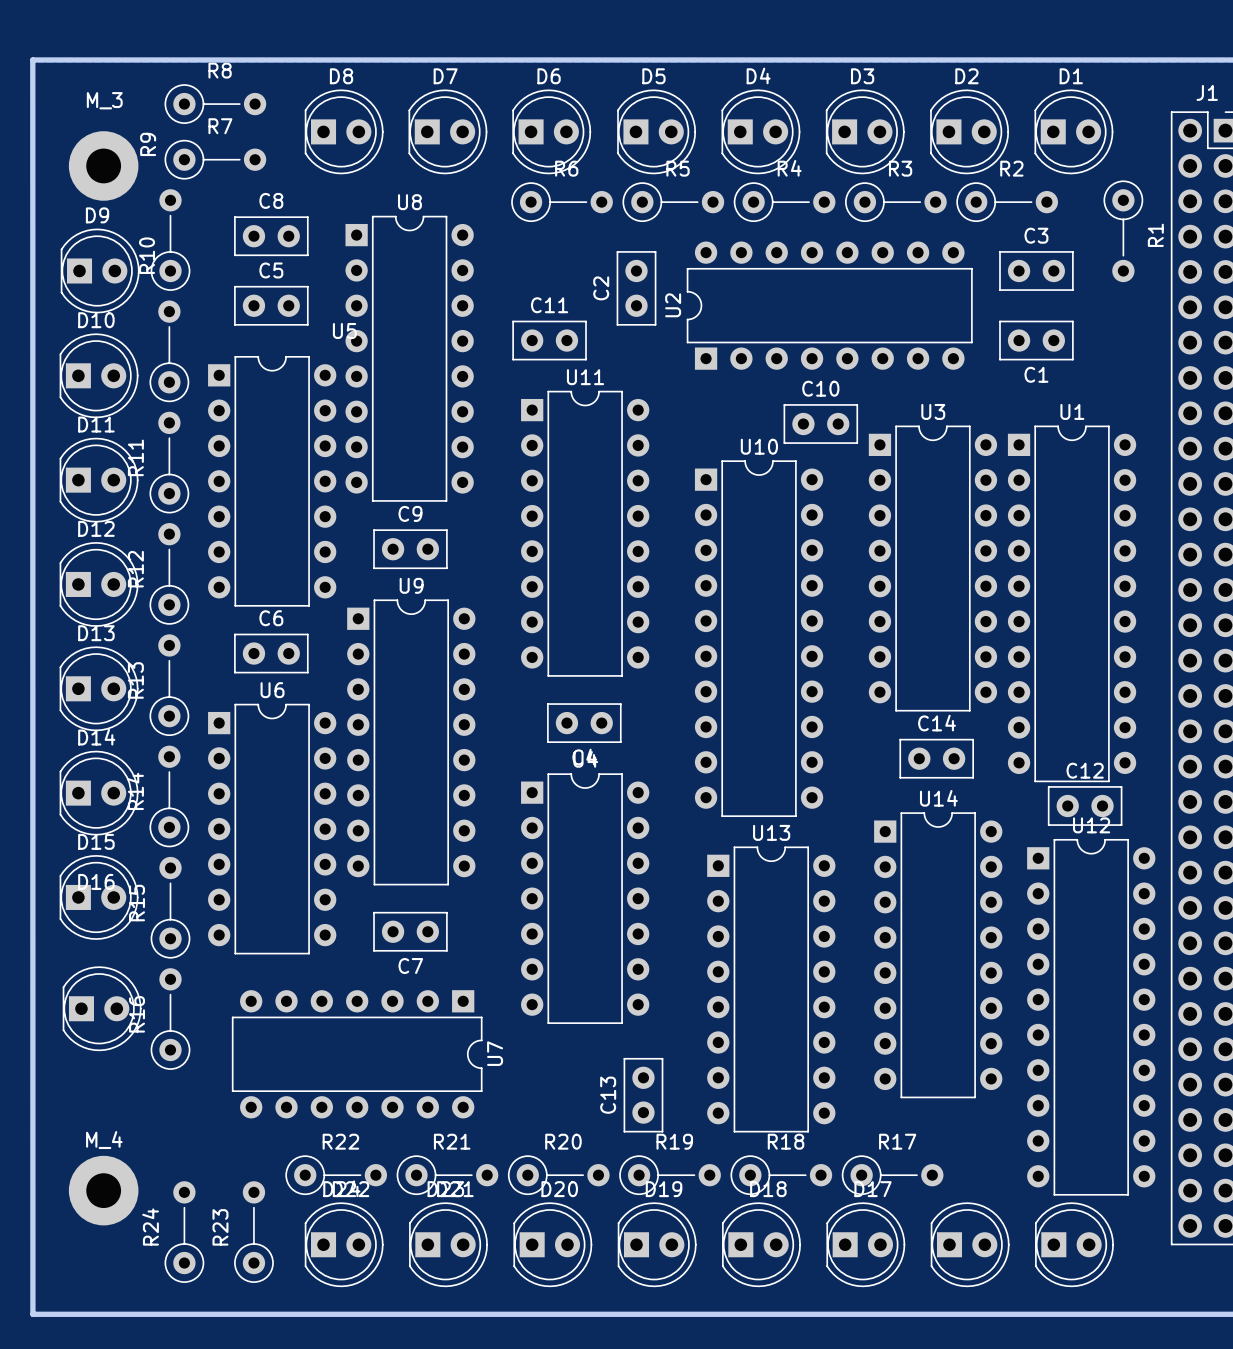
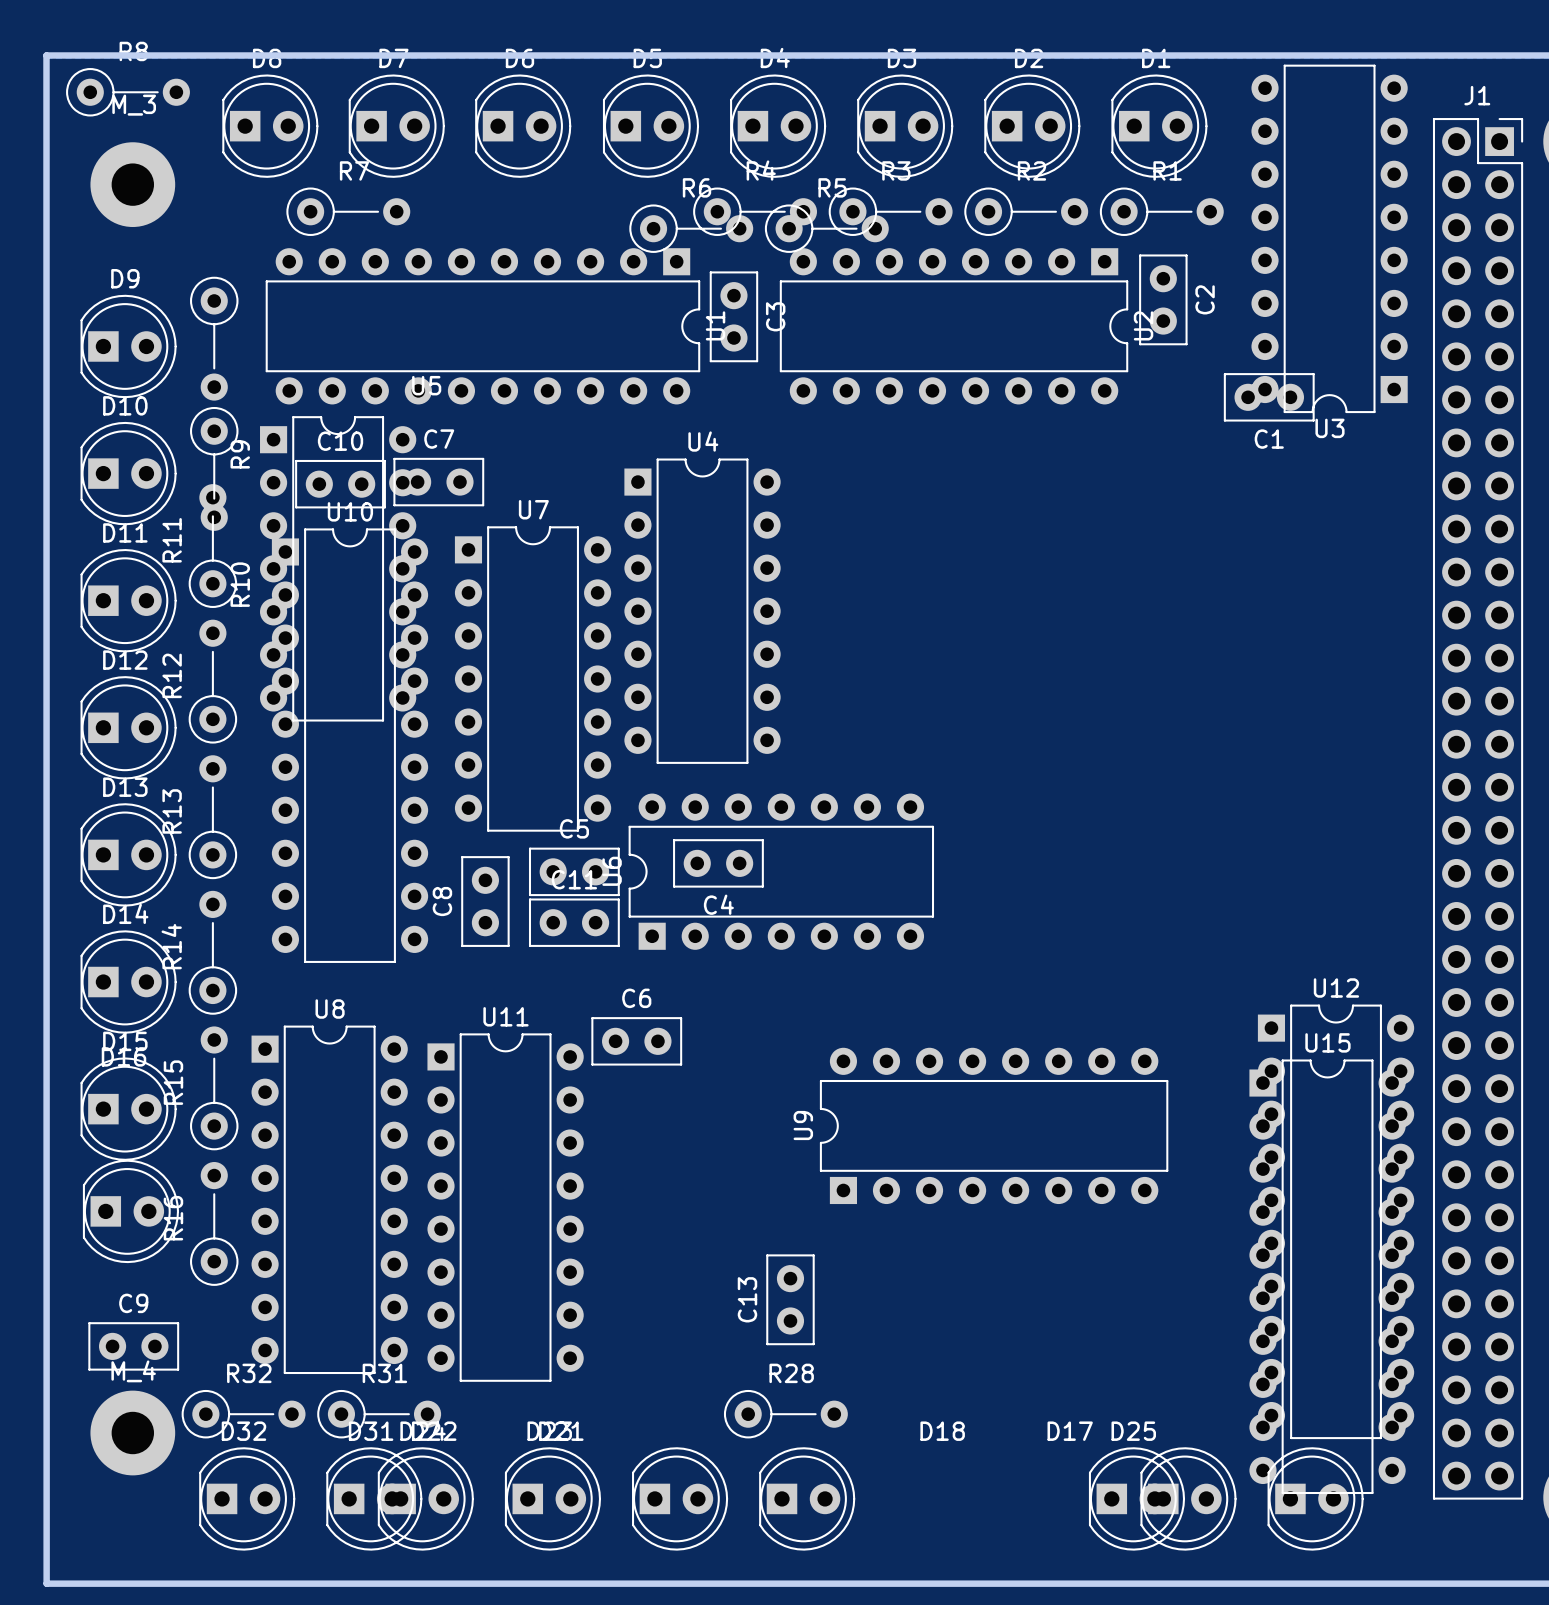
R8 position: (215, 104) -> (127, 92)
D8 position: (344, 131) -> (270, 126)
D7 position: (447, 131) -> (396, 126)
D6 position: (551, 131) -> (523, 126)
D5 position: (656, 131) -> (651, 126)
D4 position: (760, 131) -> (778, 126)
D3 position: (865, 131) -> (905, 126)
D2 position: (969, 131) -> (1032, 126)
D1 position: (1073, 131) -> (1159, 126)
R7 position: (215, 159) -> (348, 211)
C8 name position: C8 (271, 200) -> C8 (442, 901)
R4 position: (784, 202) -> (755, 211)
R3 position: (895, 202) -> (890, 211)
R2 position: (1007, 202) -> (1026, 211)
R1 rotation: 0° (1123, 231) -> 90° counterclockwise (1161, 211)
R1 position: (1123, 231) -> (1161, 211)
C8 rotation: 0° (271, 236) -> 90° clockwise (485, 901)
C8 position: (271, 236) -> (485, 901)
R9 rotation: 0° (170, 240) -> 180° (214, 338)
D9 position: (100, 270) -> (128, 346)
C3 rotation: 0° (1036, 270) -> 90° clockwise (733, 316)
C3 position: (1036, 270) -> (733, 316)
C2 name position: C2 (601, 288) -> C2 (1205, 299)
C2 position: (636, 288) -> (1163, 299)
C5 position: (271, 305) -> (574, 871)
U2 rotation: 0° (829, 305) -> 180° (954, 326)
D10 footprint: [59, 333, 139, 419] -> [80, 421, 177, 526]
C11 position: (549, 340) -> (574, 922)
R10 rotation: 0° (169, 351) -> 180° (214, 468)
U8 position: (409, 358) -> (329, 1199)
C10 position: (820, 424) -> (340, 484)
D11 footprint: [59, 437, 139, 523] -> [80, 549, 177, 653]
U11 position: (585, 533) -> (505, 1207)
D12 footprint: [59, 542, 139, 627] -> [80, 676, 177, 780]
C9 position: (410, 549) -> (133, 1346)
U3 rotation: 0° (932, 568) -> 180° (1329, 238)
U3 position: (932, 568) -> (1329, 238)
U1 rotation: 0° (1072, 603) -> 90° clockwise (482, 326)
U1 position: (1072, 603) -> (482, 326)
U10 position: (759, 638) -> (350, 745)
D13 footprint: [59, 646, 139, 732] -> [80, 803, 177, 907]
C6 position: (271, 653) -> (636, 1041)
U9 rotation: 0° (411, 742) -> 90° counterclockwise (994, 1125)
U9 position: (411, 742) -> (994, 1125)
D14 footprint: [59, 750, 139, 836] -> [80, 930, 177, 1034]
C14: (936, 758) -> none
C12: (1085, 806) -> none
U6 rotation: 0° (272, 829) -> 90° counterclockwise (781, 871)
U6 position: (272, 829) -> (781, 871)
D15 footprint: [59, 855, 139, 940] -> [80, 1057, 177, 1161]
U4 position: (585, 898) -> (702, 611)
C7 position: (410, 931) -> (438, 482)
U14: (938, 955) -> none
C7 name position: C7 (410, 966) -> C7 (439, 439)
U13: (771, 989) -> none
U7 rotation: 0° (357, 1054) -> 90° counterclockwise (533, 679)
U7 position: (357, 1054) -> (533, 679)
U15: none -> (1327, 1276)
C13 position: (643, 1095) -> (790, 1299)
R32: none -> (243, 1414)
R31: none -> (379, 1414)
R22: (336, 1175) -> none
R21: (447, 1175) -> none
R20: (558, 1175) -> none
R28: none -> (785, 1414)
R19: (670, 1175) -> none
R18: (781, 1175) -> none
R17: (892, 1175) -> none
R24: (184, 1232) -> none
R23: (253, 1232) -> none
D32: none -> (247, 1498)
D31: none -> (374, 1498)
D20: (761, 1244) -> none
D19: (865, 1244) -> none
D25: none -> (1136, 1498)

